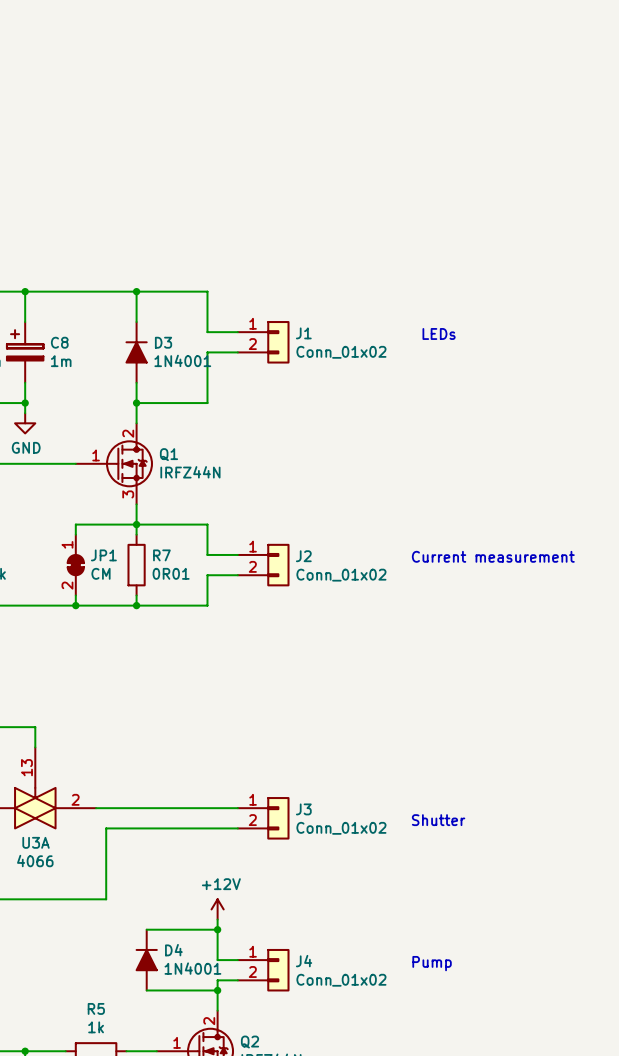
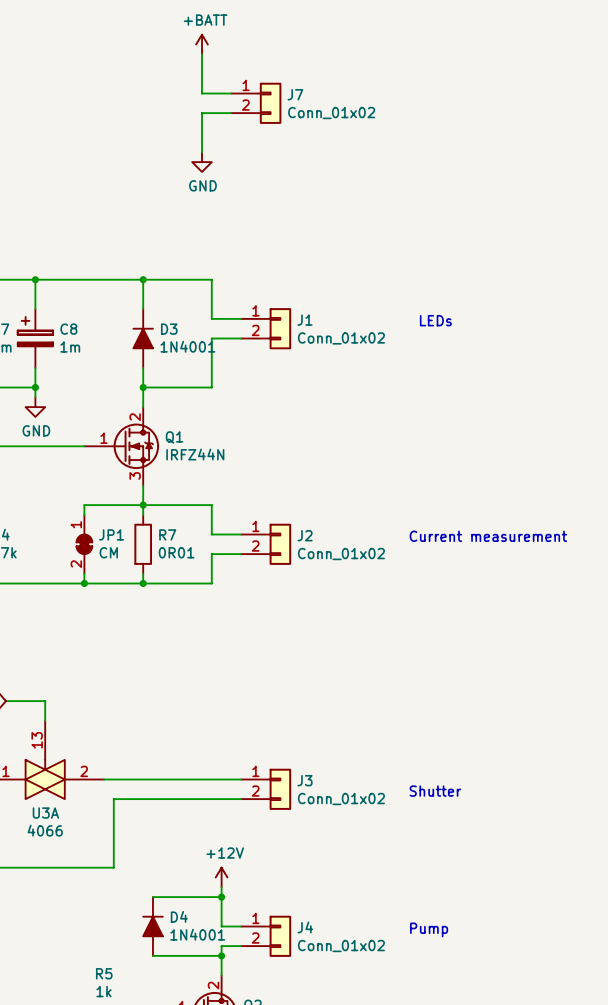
power symbol: none -> +BATT (201, 44)
wire: none -> (201, 54) (201, 93) (231, 93)
J7: none -> Conn_01x02 (256, 103)
wire: none -> (231, 113) (201, 113) (201, 152)
power symbol: none -> GND (201, 162)

